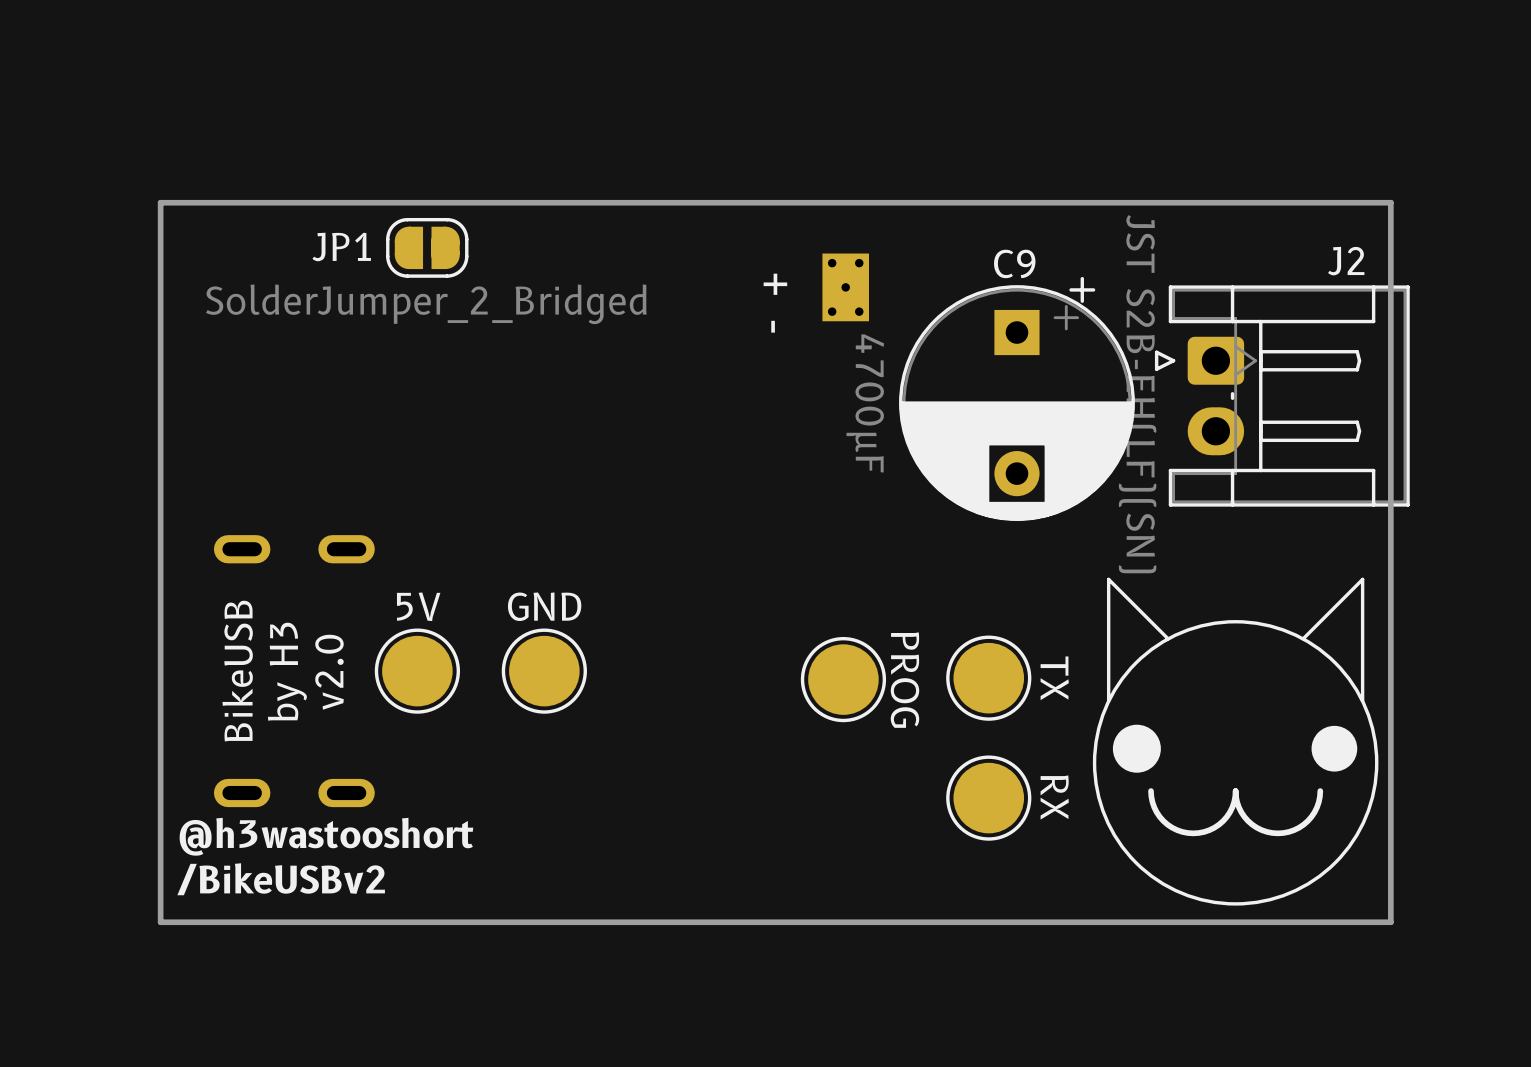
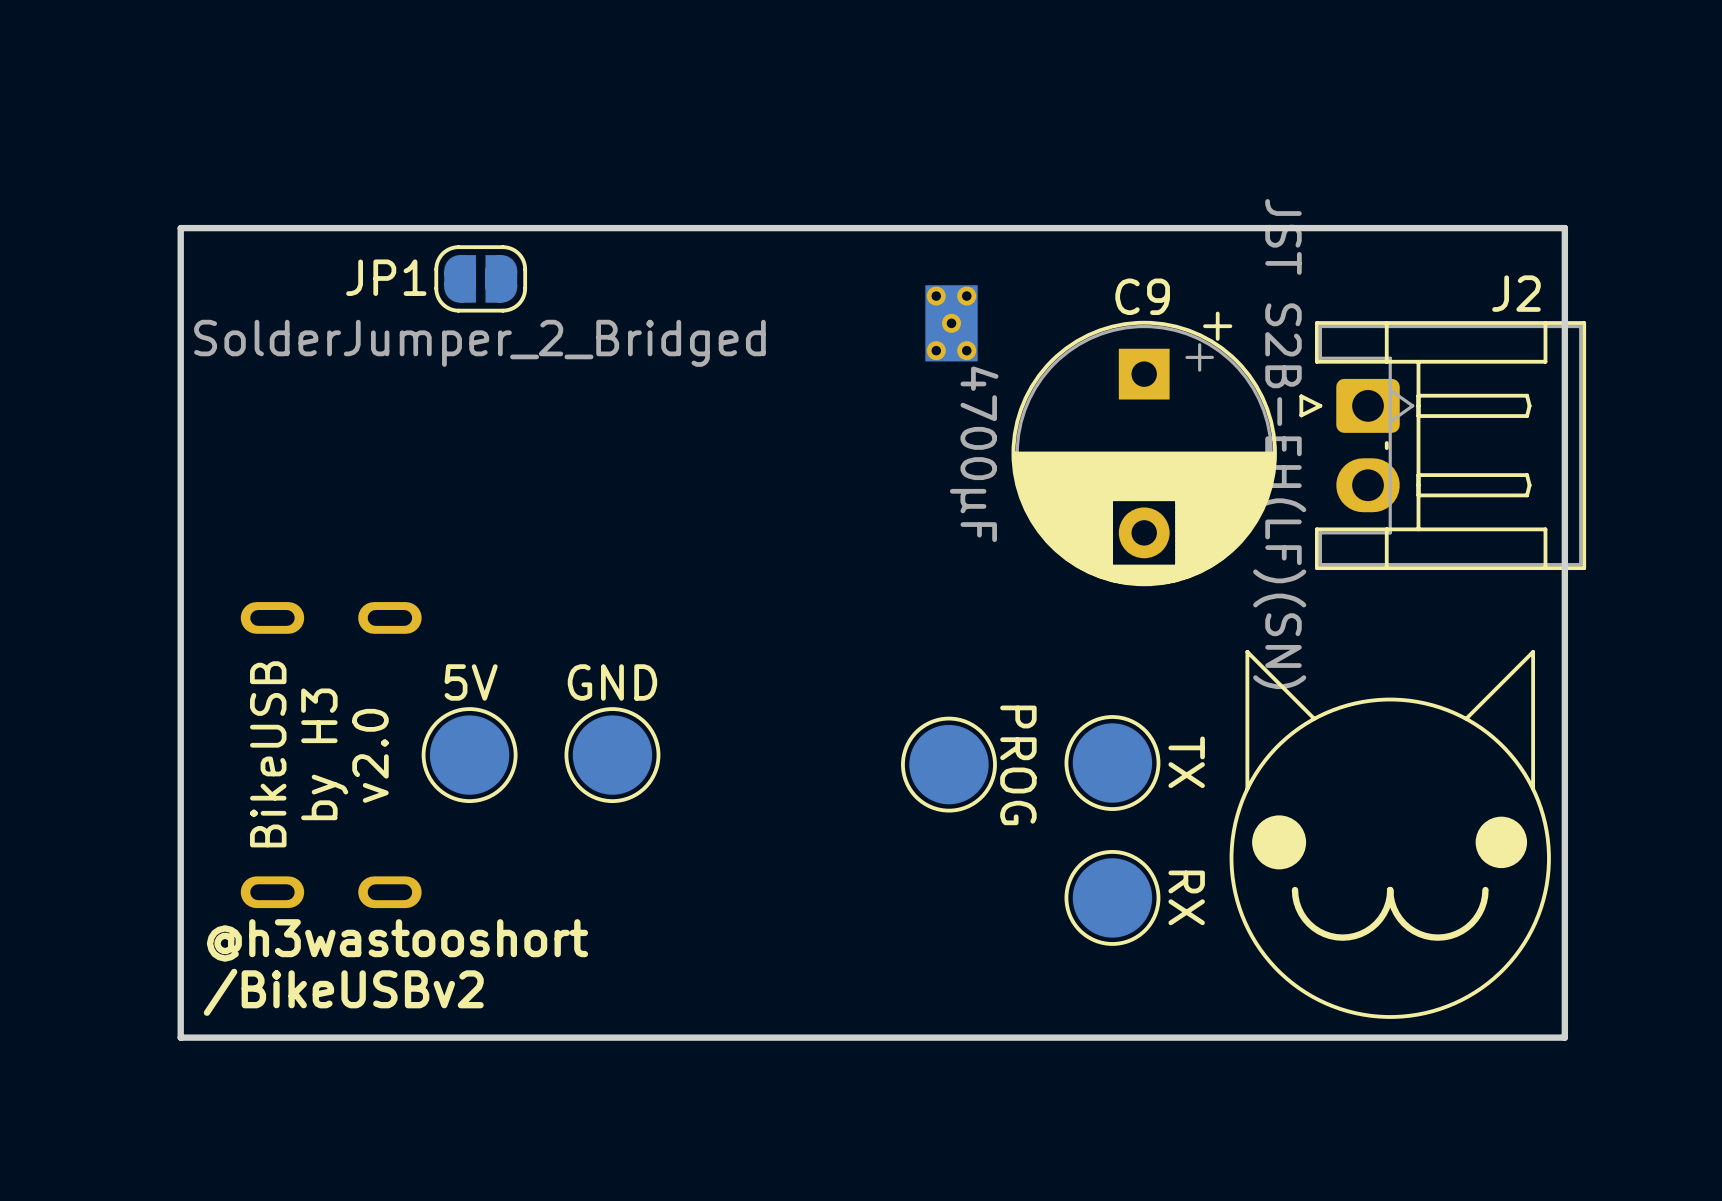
text: + - (775, 303) -> none

